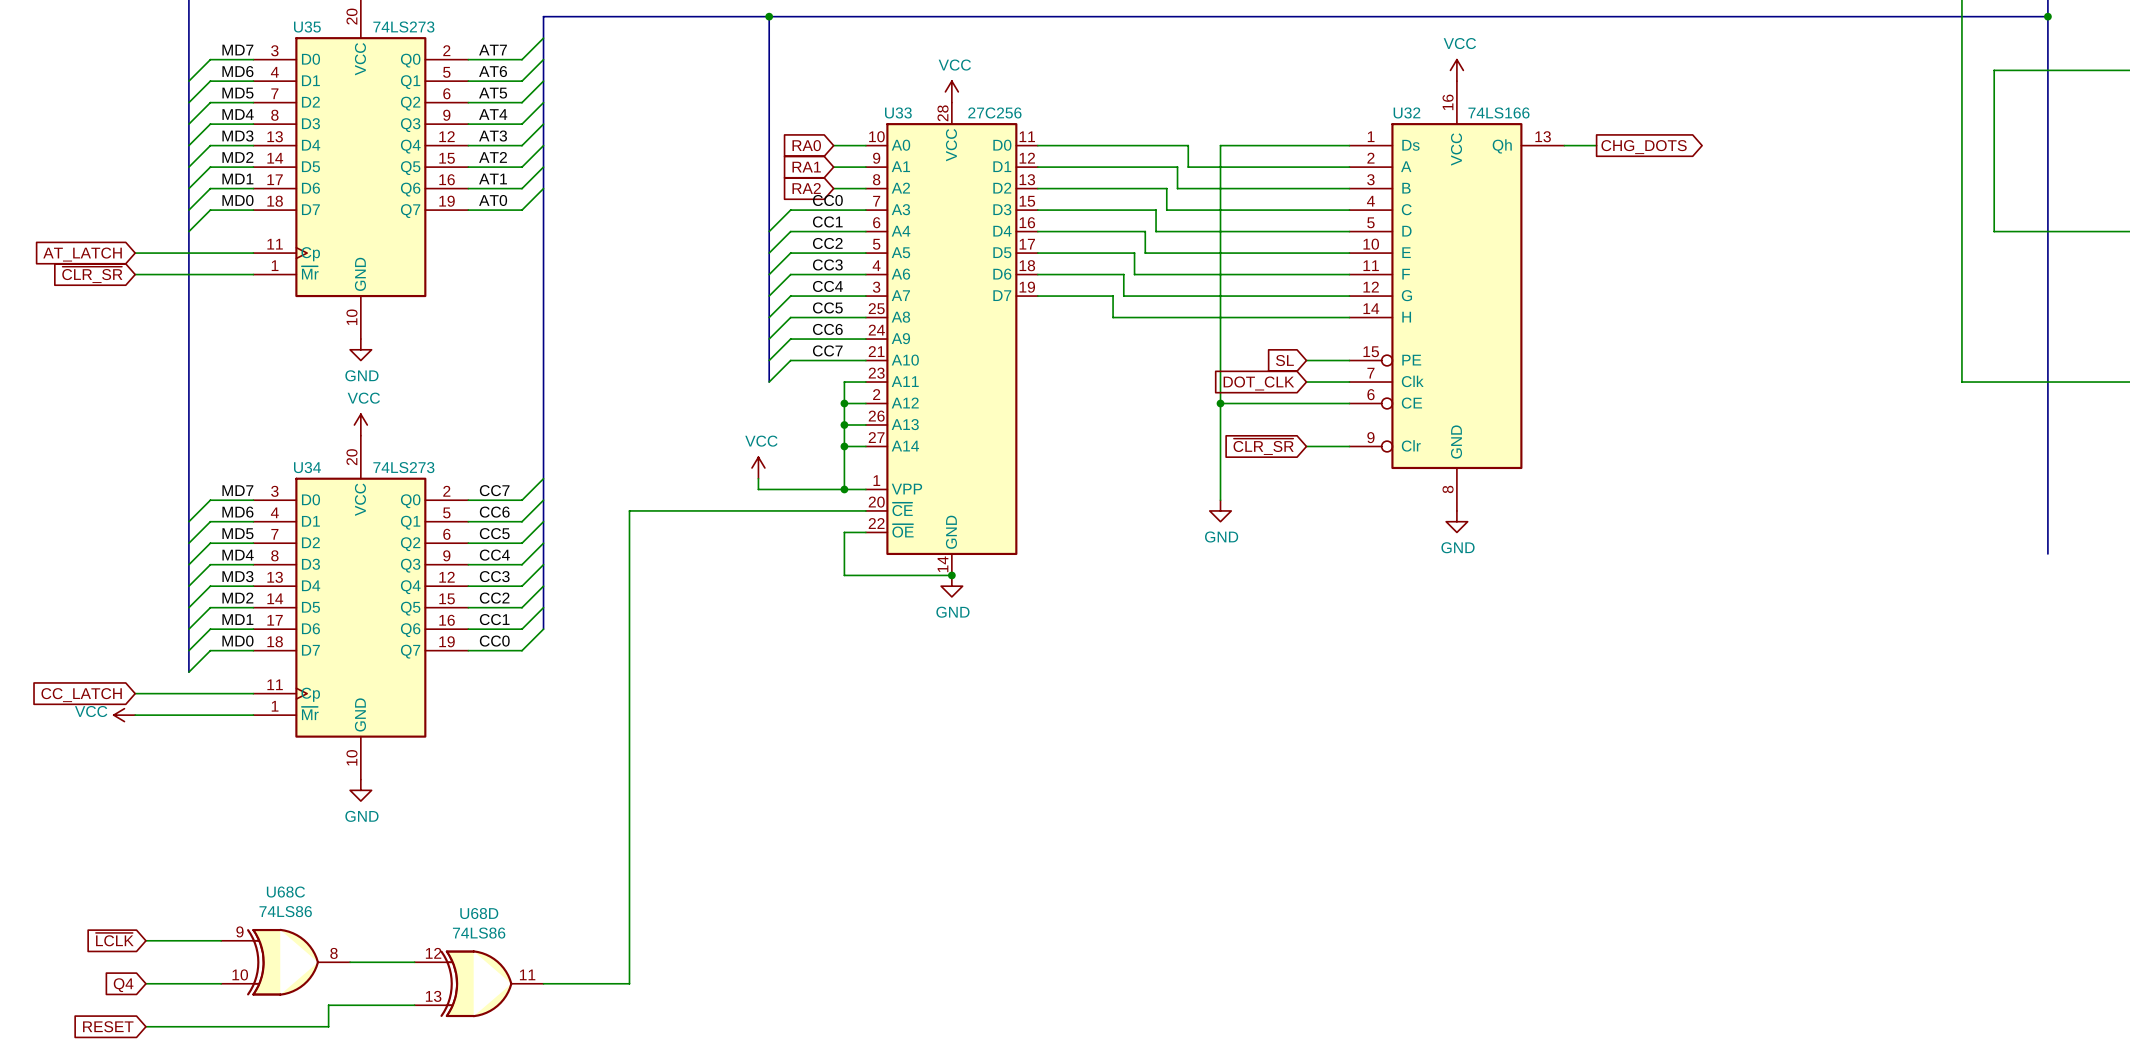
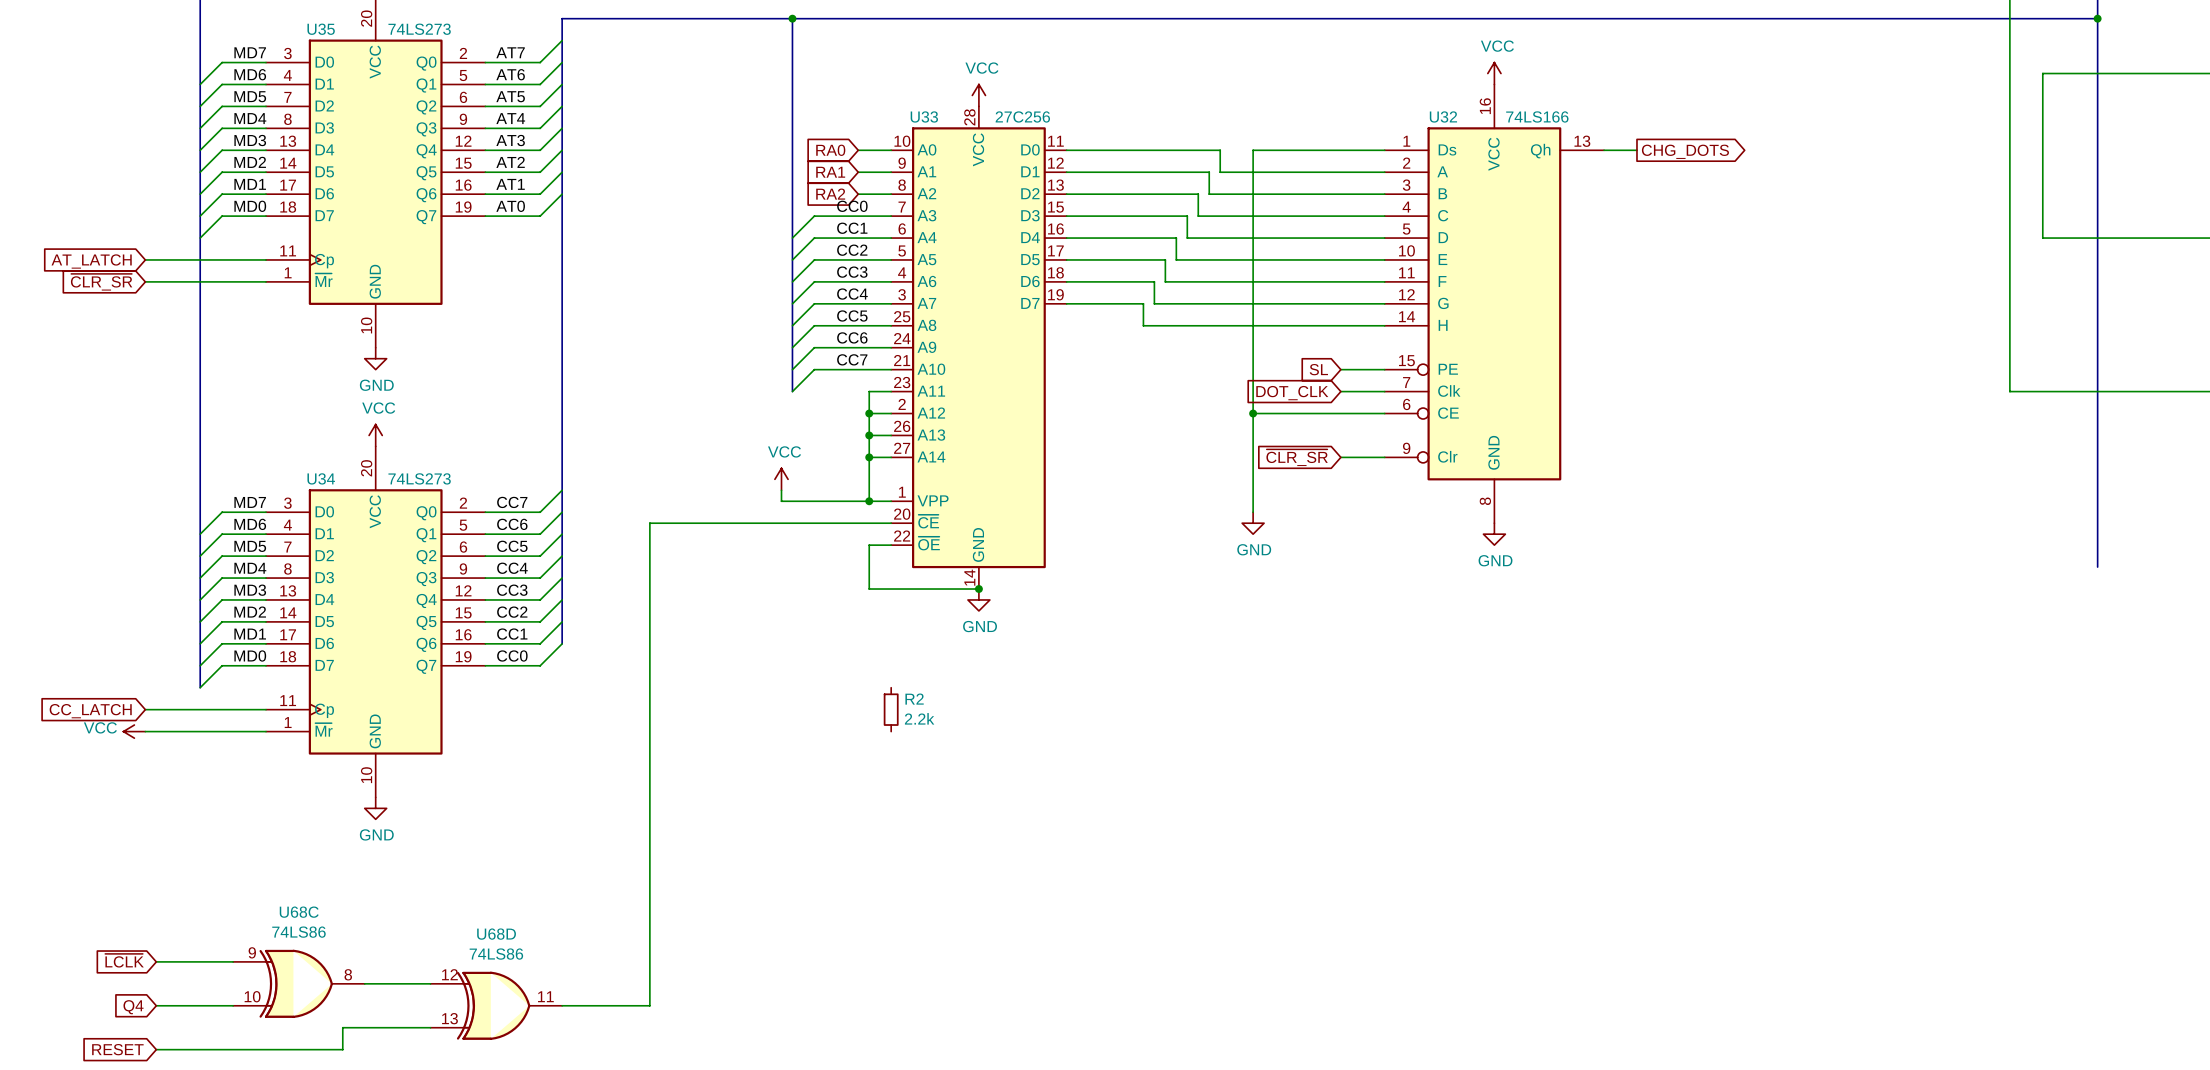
R2: none -> 2.2k (891, 709)

